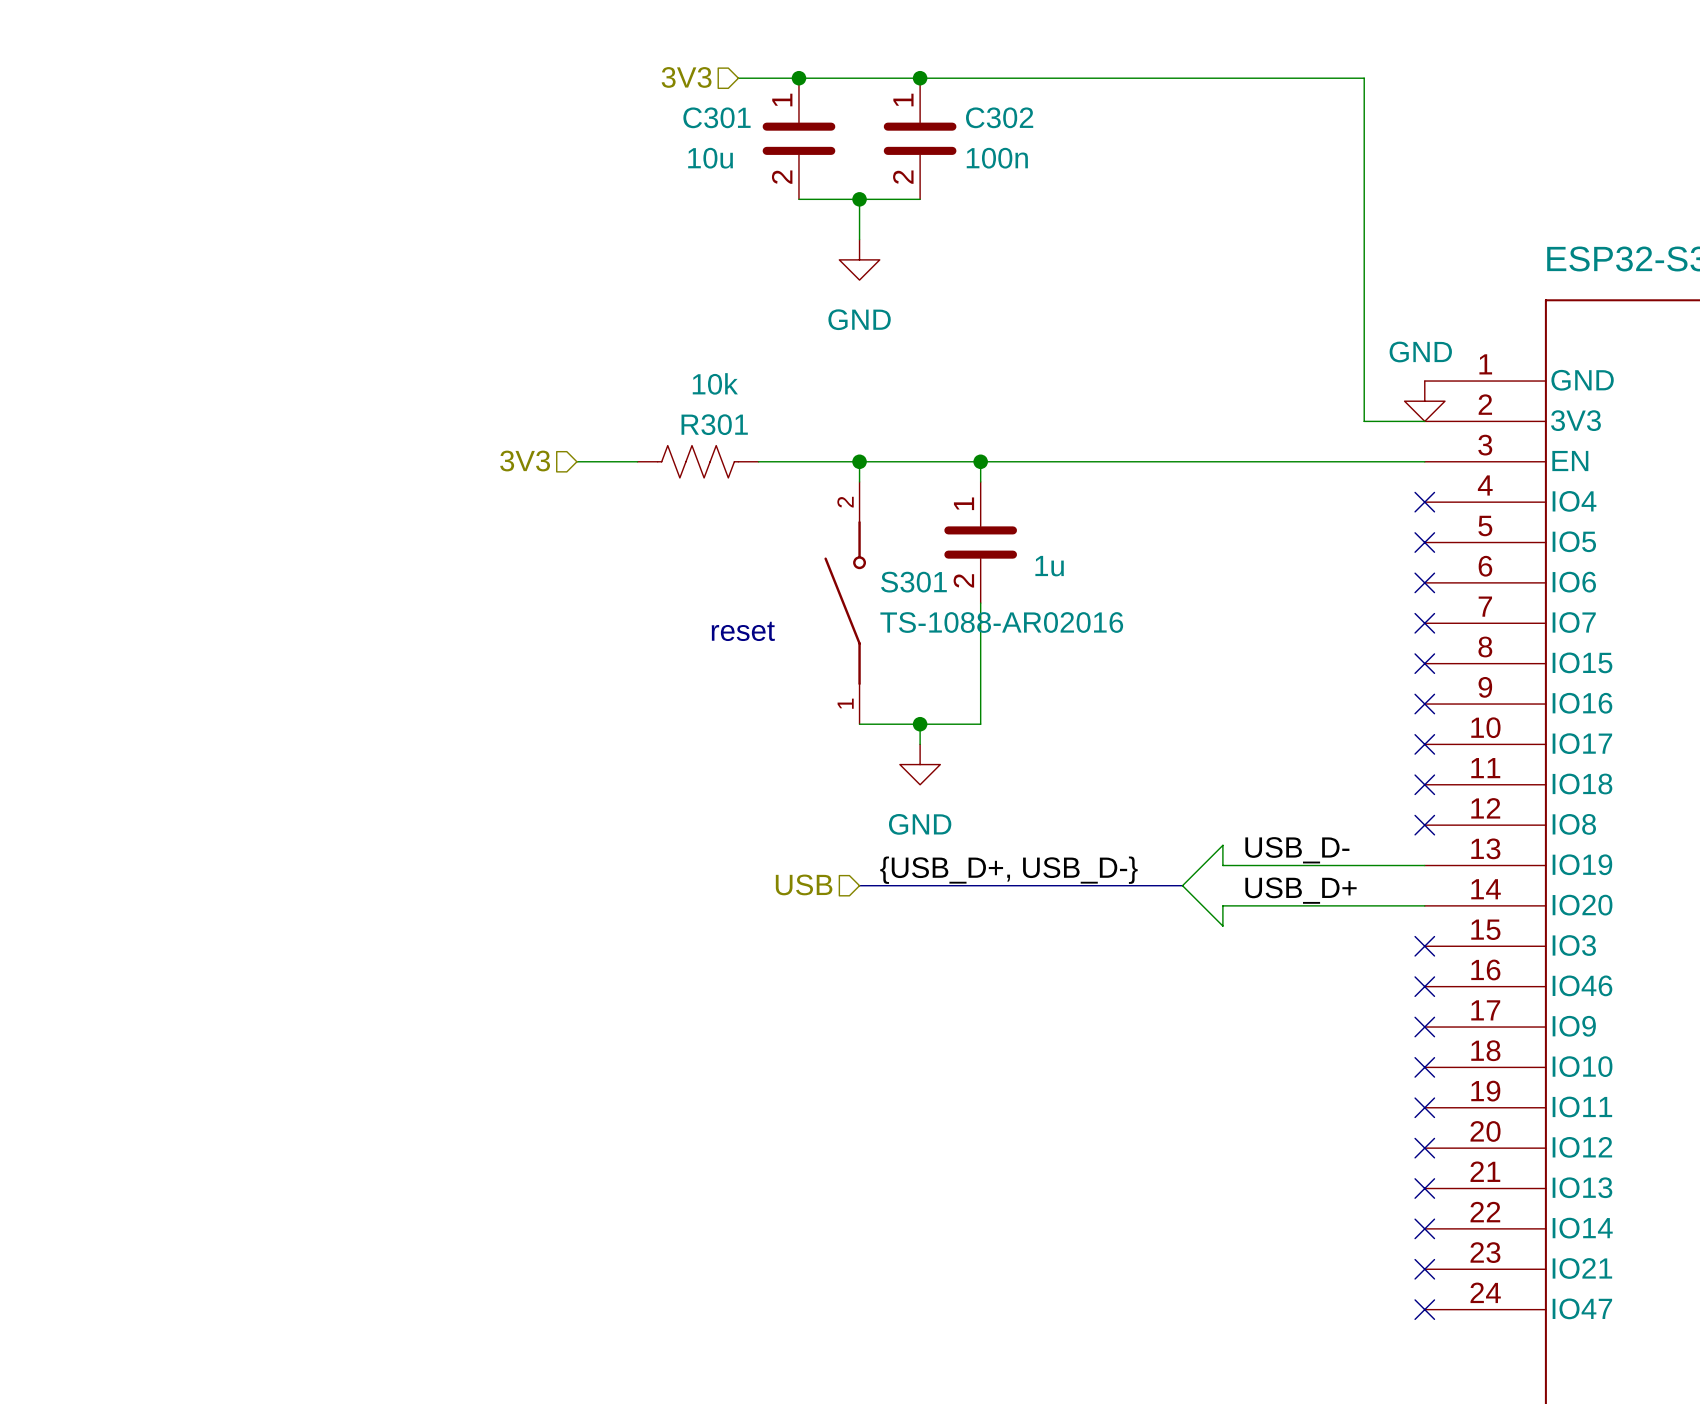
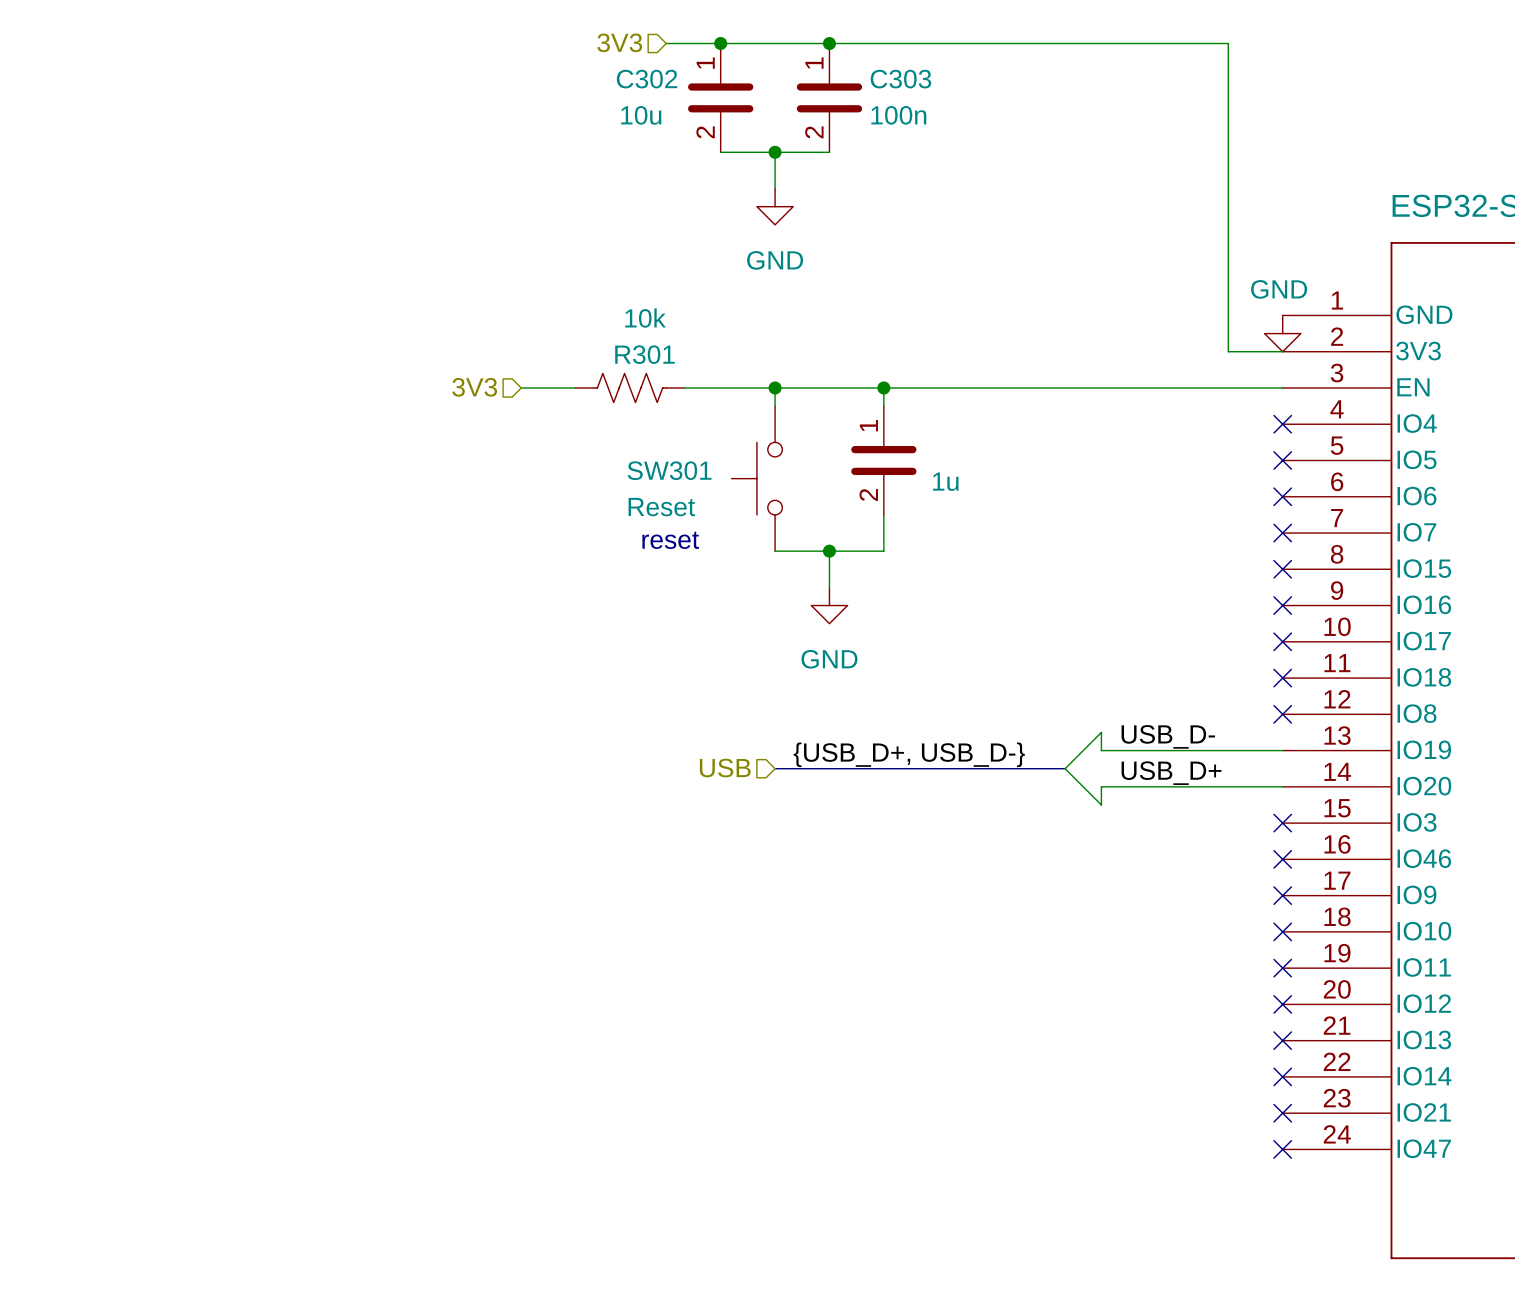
C301 name: C301 (717, 117) -> C302 (647, 79)
C302 name: C302 (999, 117) -> C303 (900, 79)
SW301: none -> Reset (756, 478)
S301: TS-1088-AR02016 (845, 603) -> none
wire: none -> (829, 551) (829, 587)
wire: (980, 643) (980, 724) (859, 724) -> (883, 551) (775, 551)
wire: (920, 724) (920, 744) -> none
junction position: (920, 724) -> (829, 551)
power symbol position: GND (920, 764) -> GND (829, 605)

